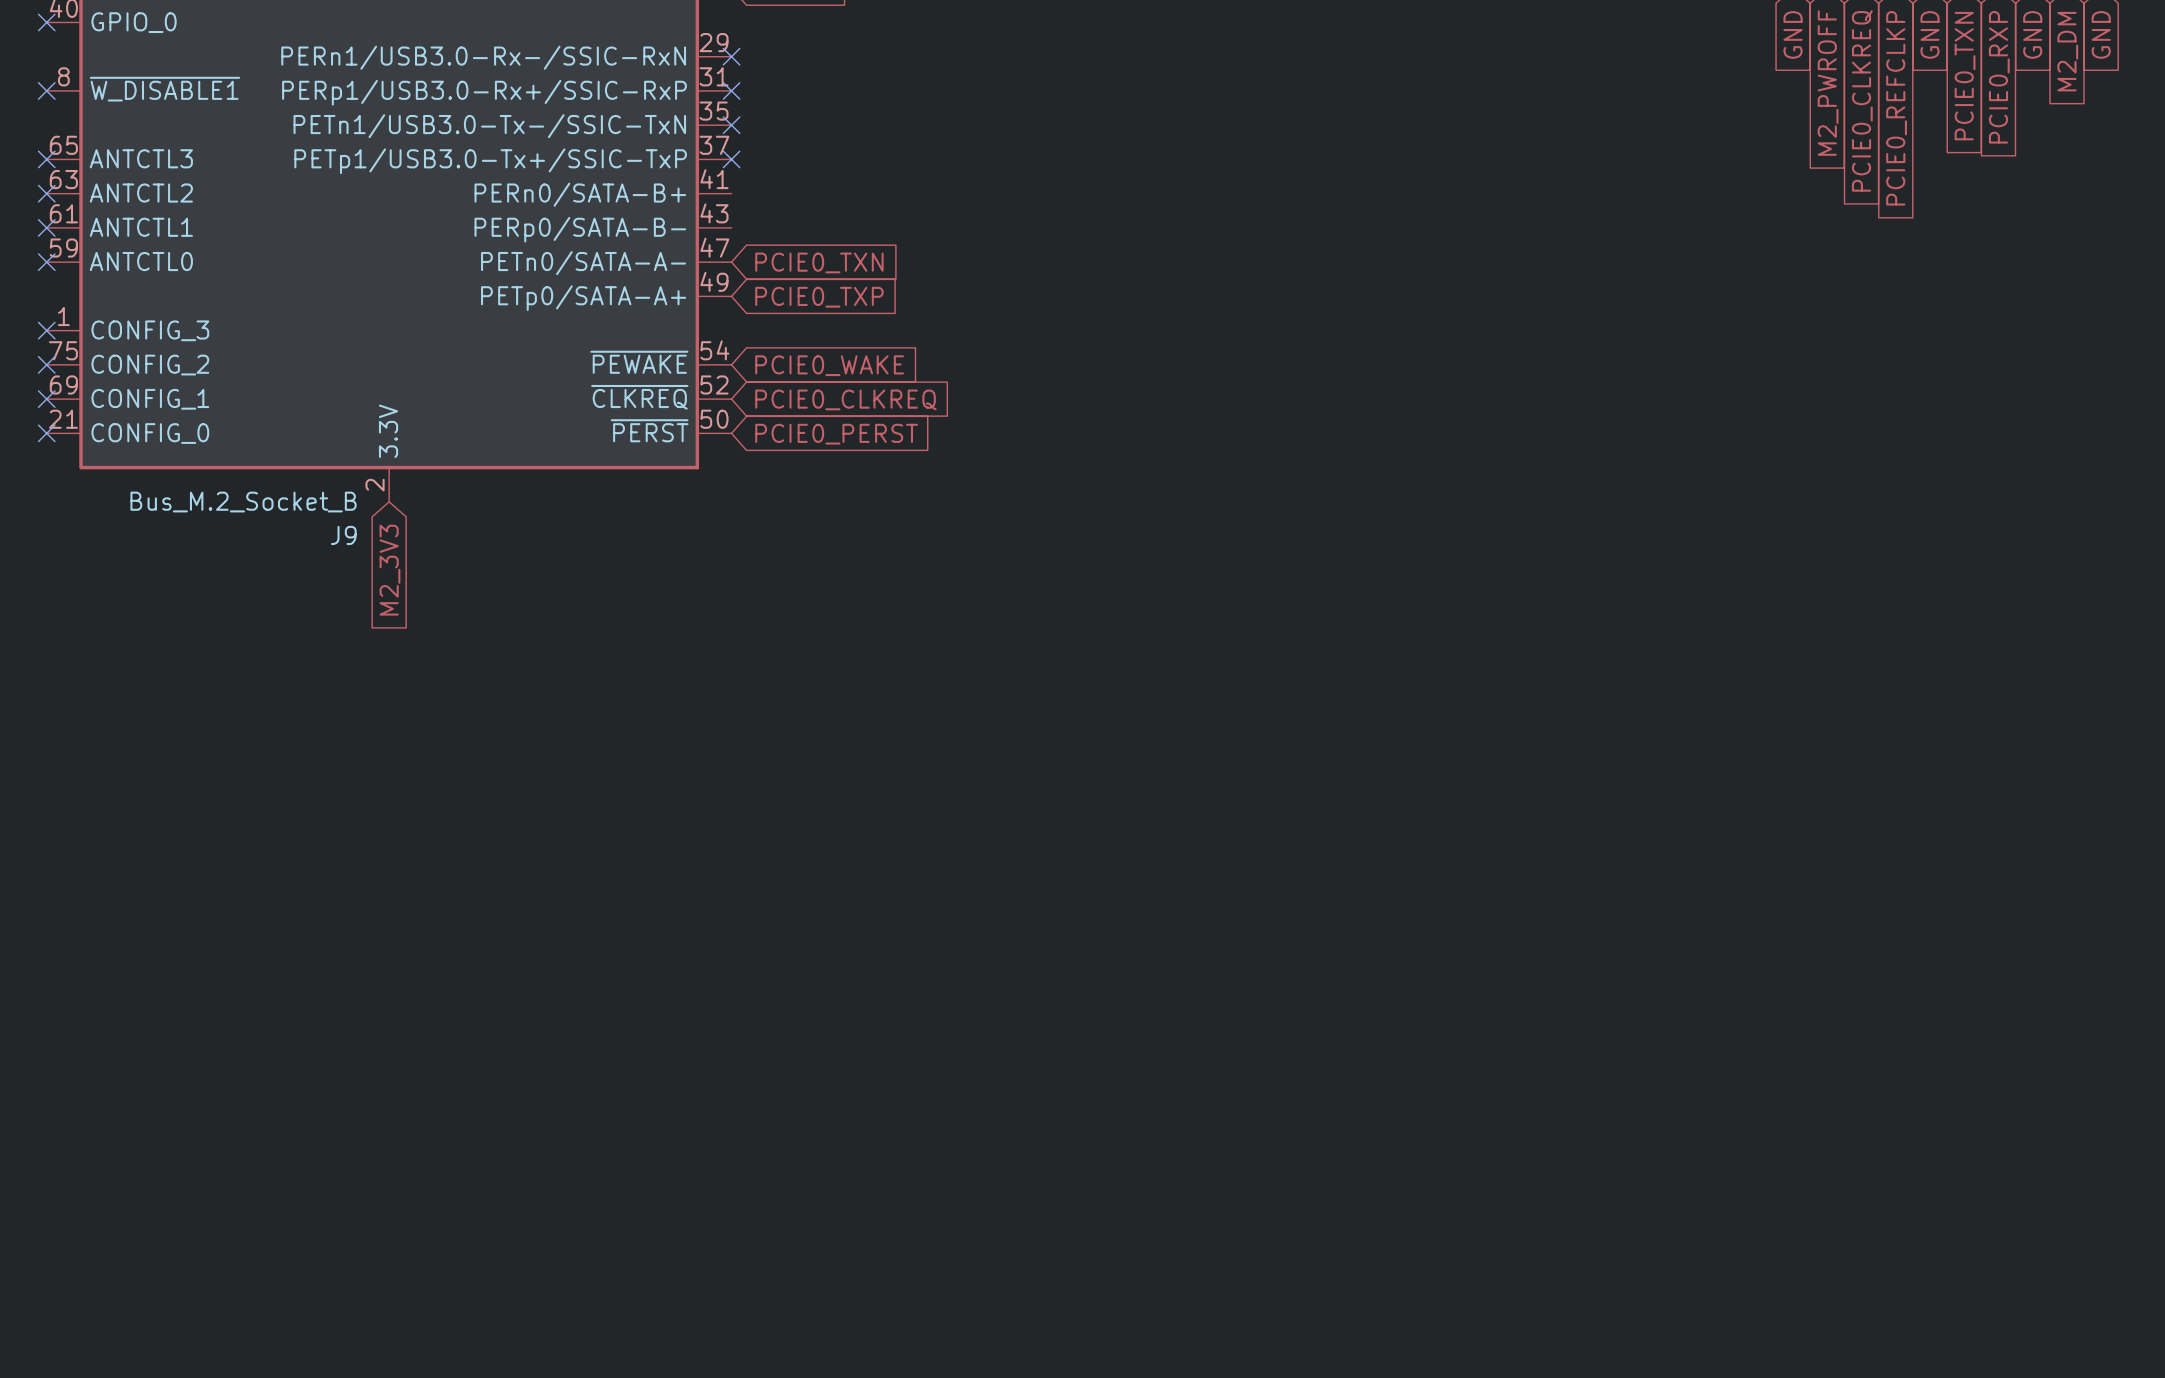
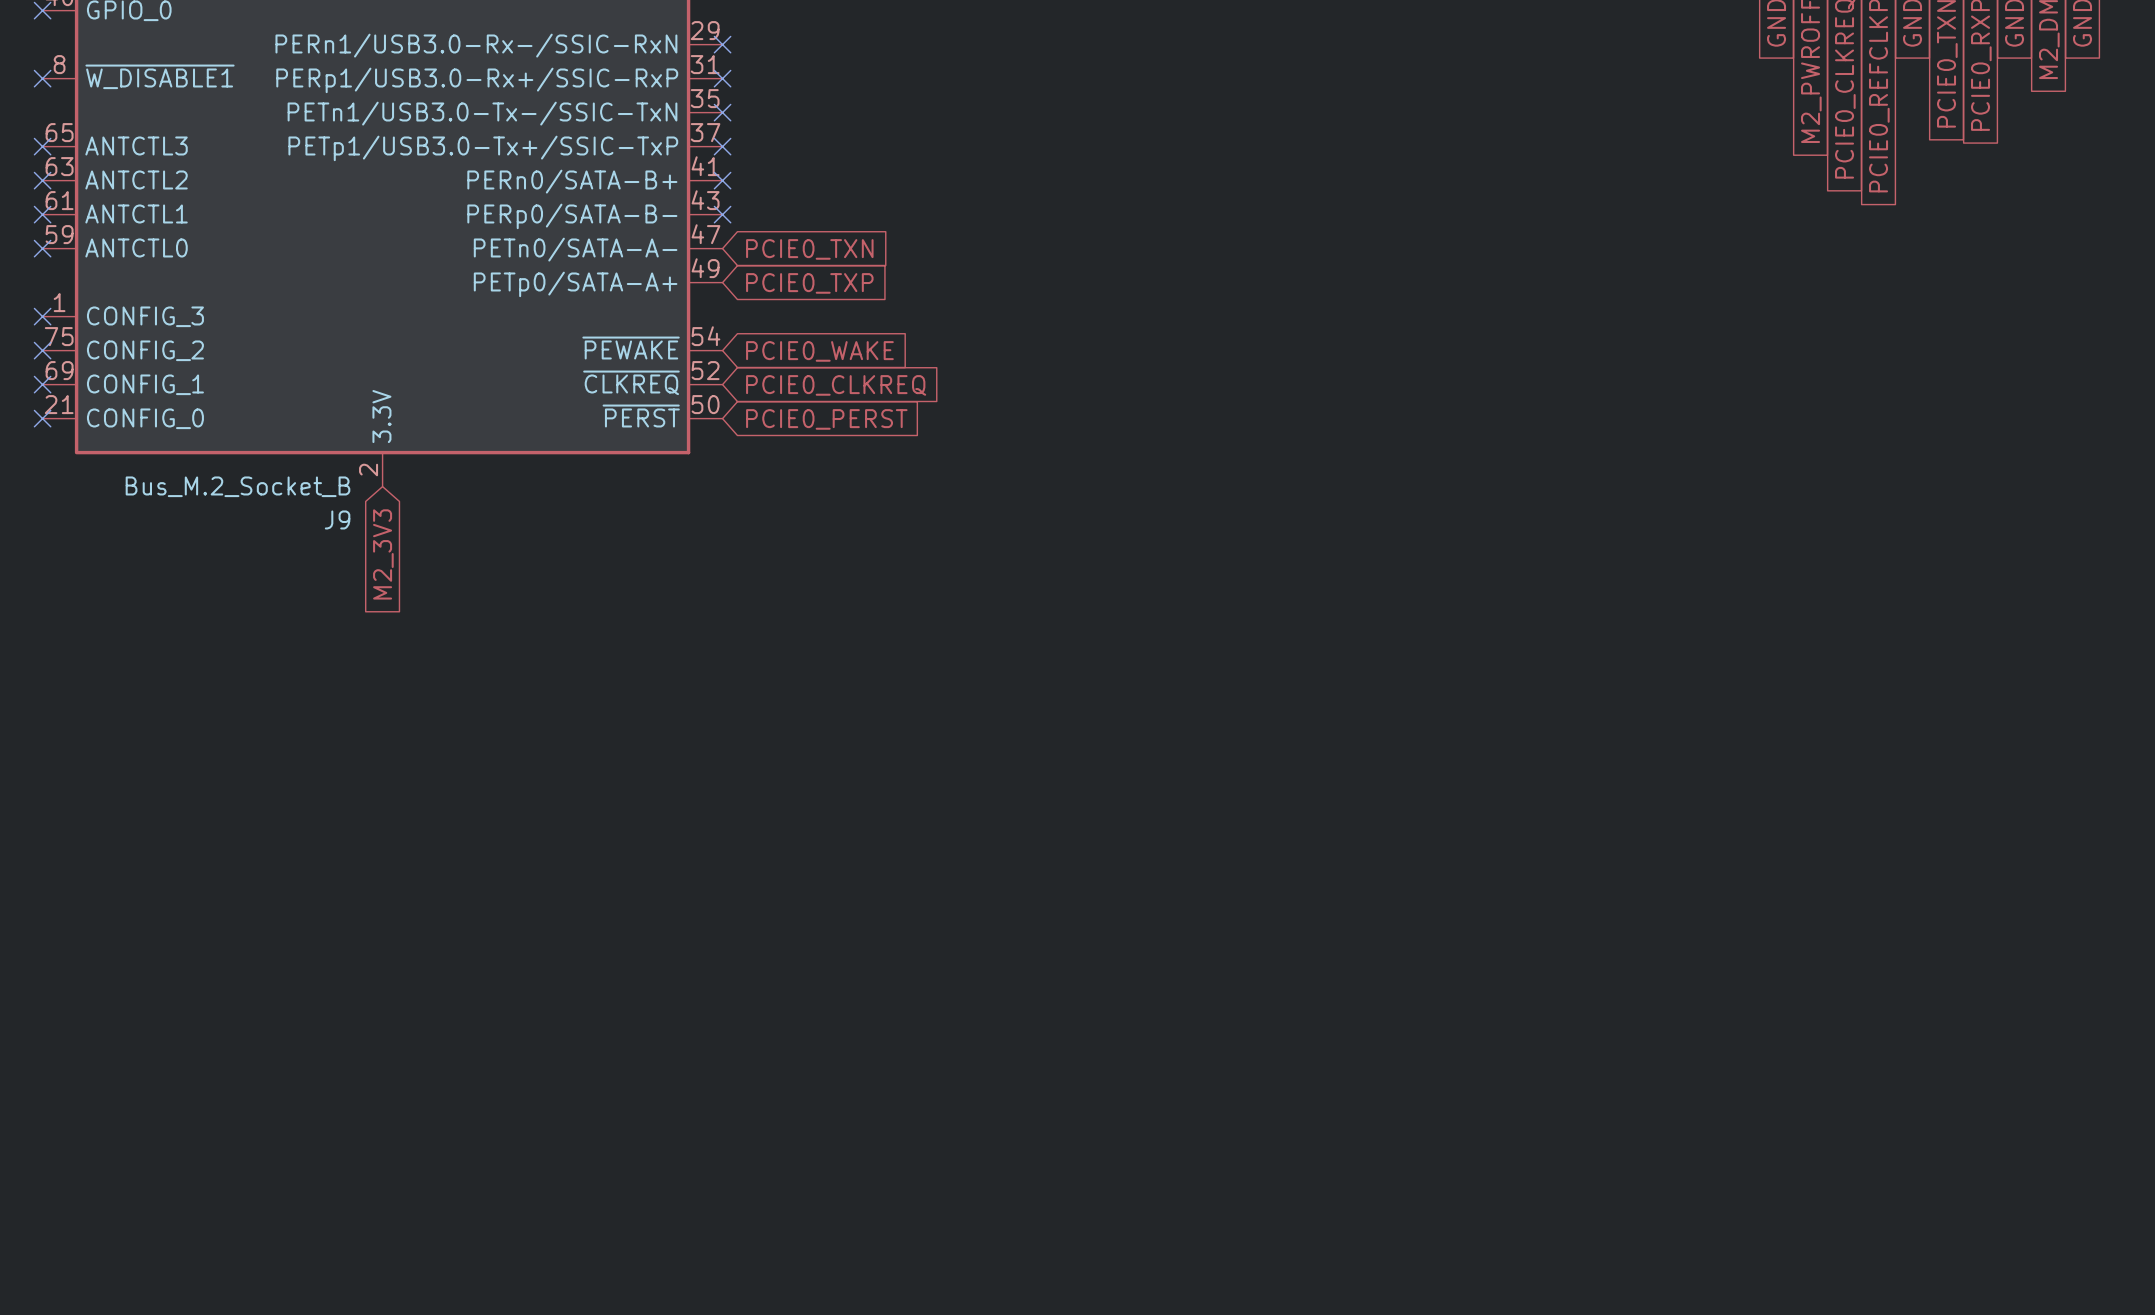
no-connect mark: none -> (722, 180)
no-connect mark: none -> (722, 214)

